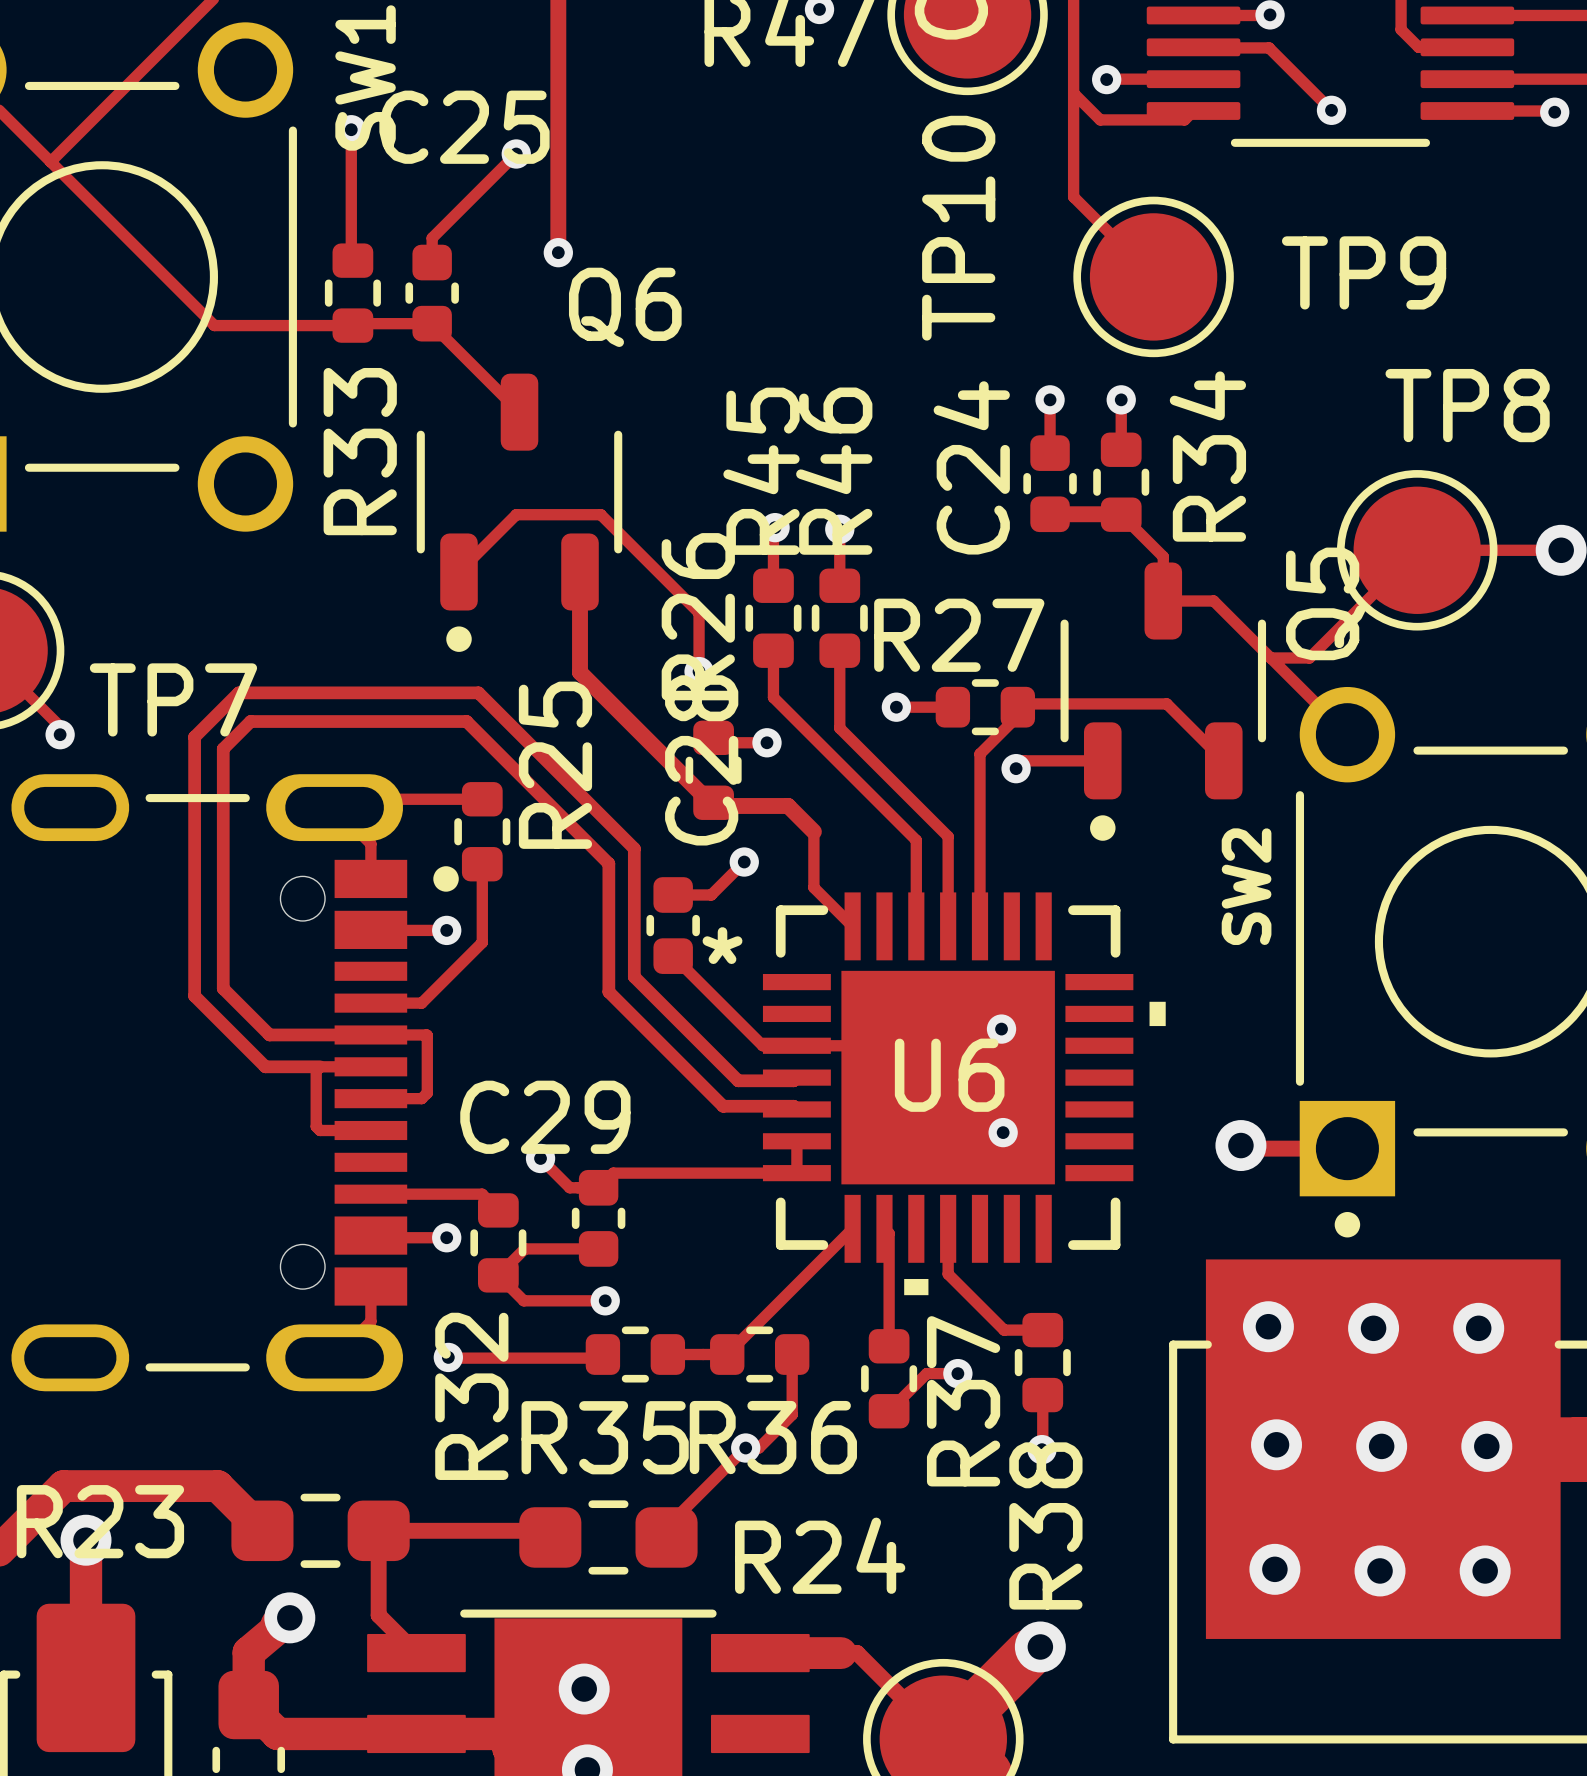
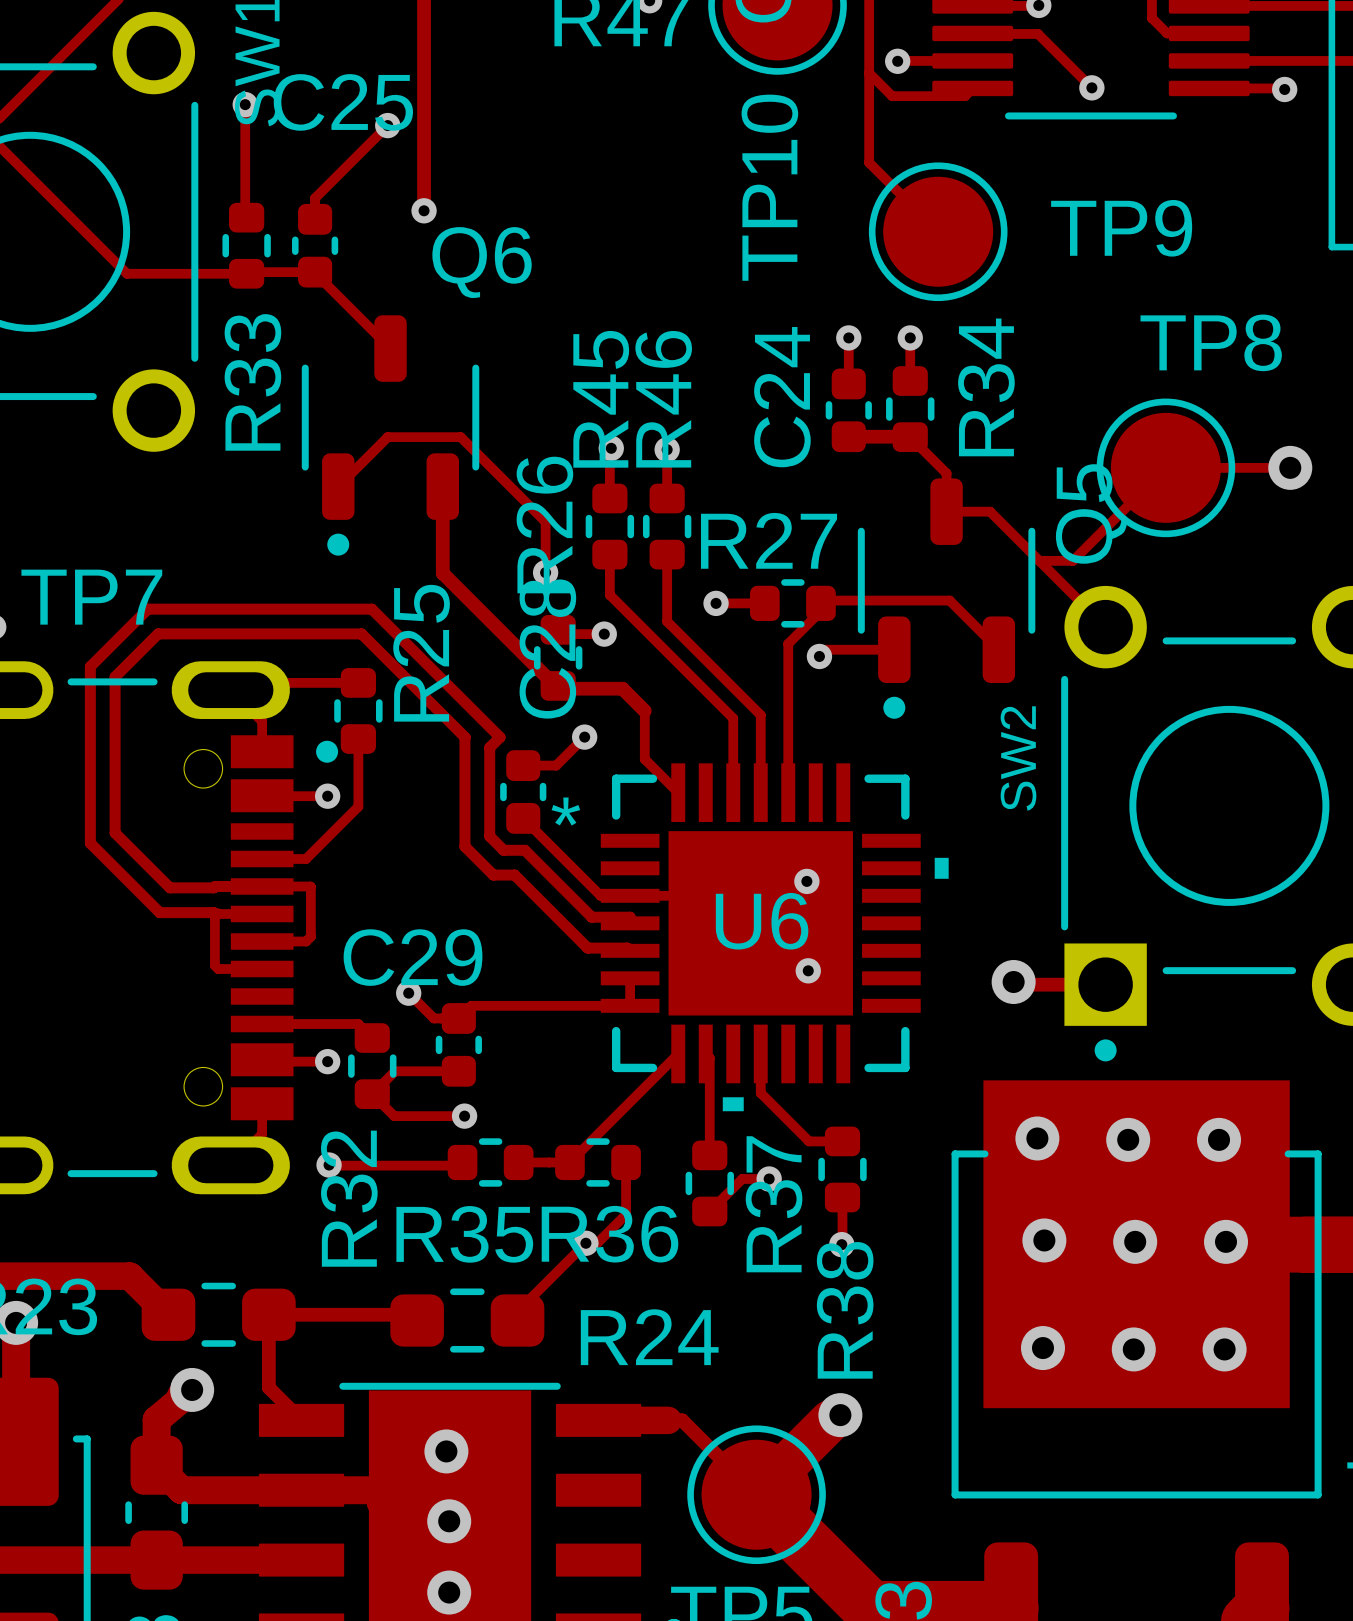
track: (634, 874) (634, 848) (478, 692) (238, 692) (194, 737) (194, 996) (265, 1066) (316, 1066) -> (489, 747) (500, 737) (371, 609) (147, 609) (90, 666) (90, 843) (159, 912) (215, 914)
track: (608, 991) (608, 863) (466, 721) (250, 721) (223, 748) (223, 988) (269, 1034) (316, 1034) -> (467, 849) (464, 846) (464, 737) (361, 633) (158, 633) (115, 676) (115, 832) (170, 887) (215, 886)
track: (650, 993) (738, 1080) (793, 1080) (796, 1077) -> (503, 850) (524, 850) (591, 917) (630, 917) (630, 923)
track: (638, 1021) (723, 1106) (747, 1106) -> (493, 875) (514, 875) (587, 948)

